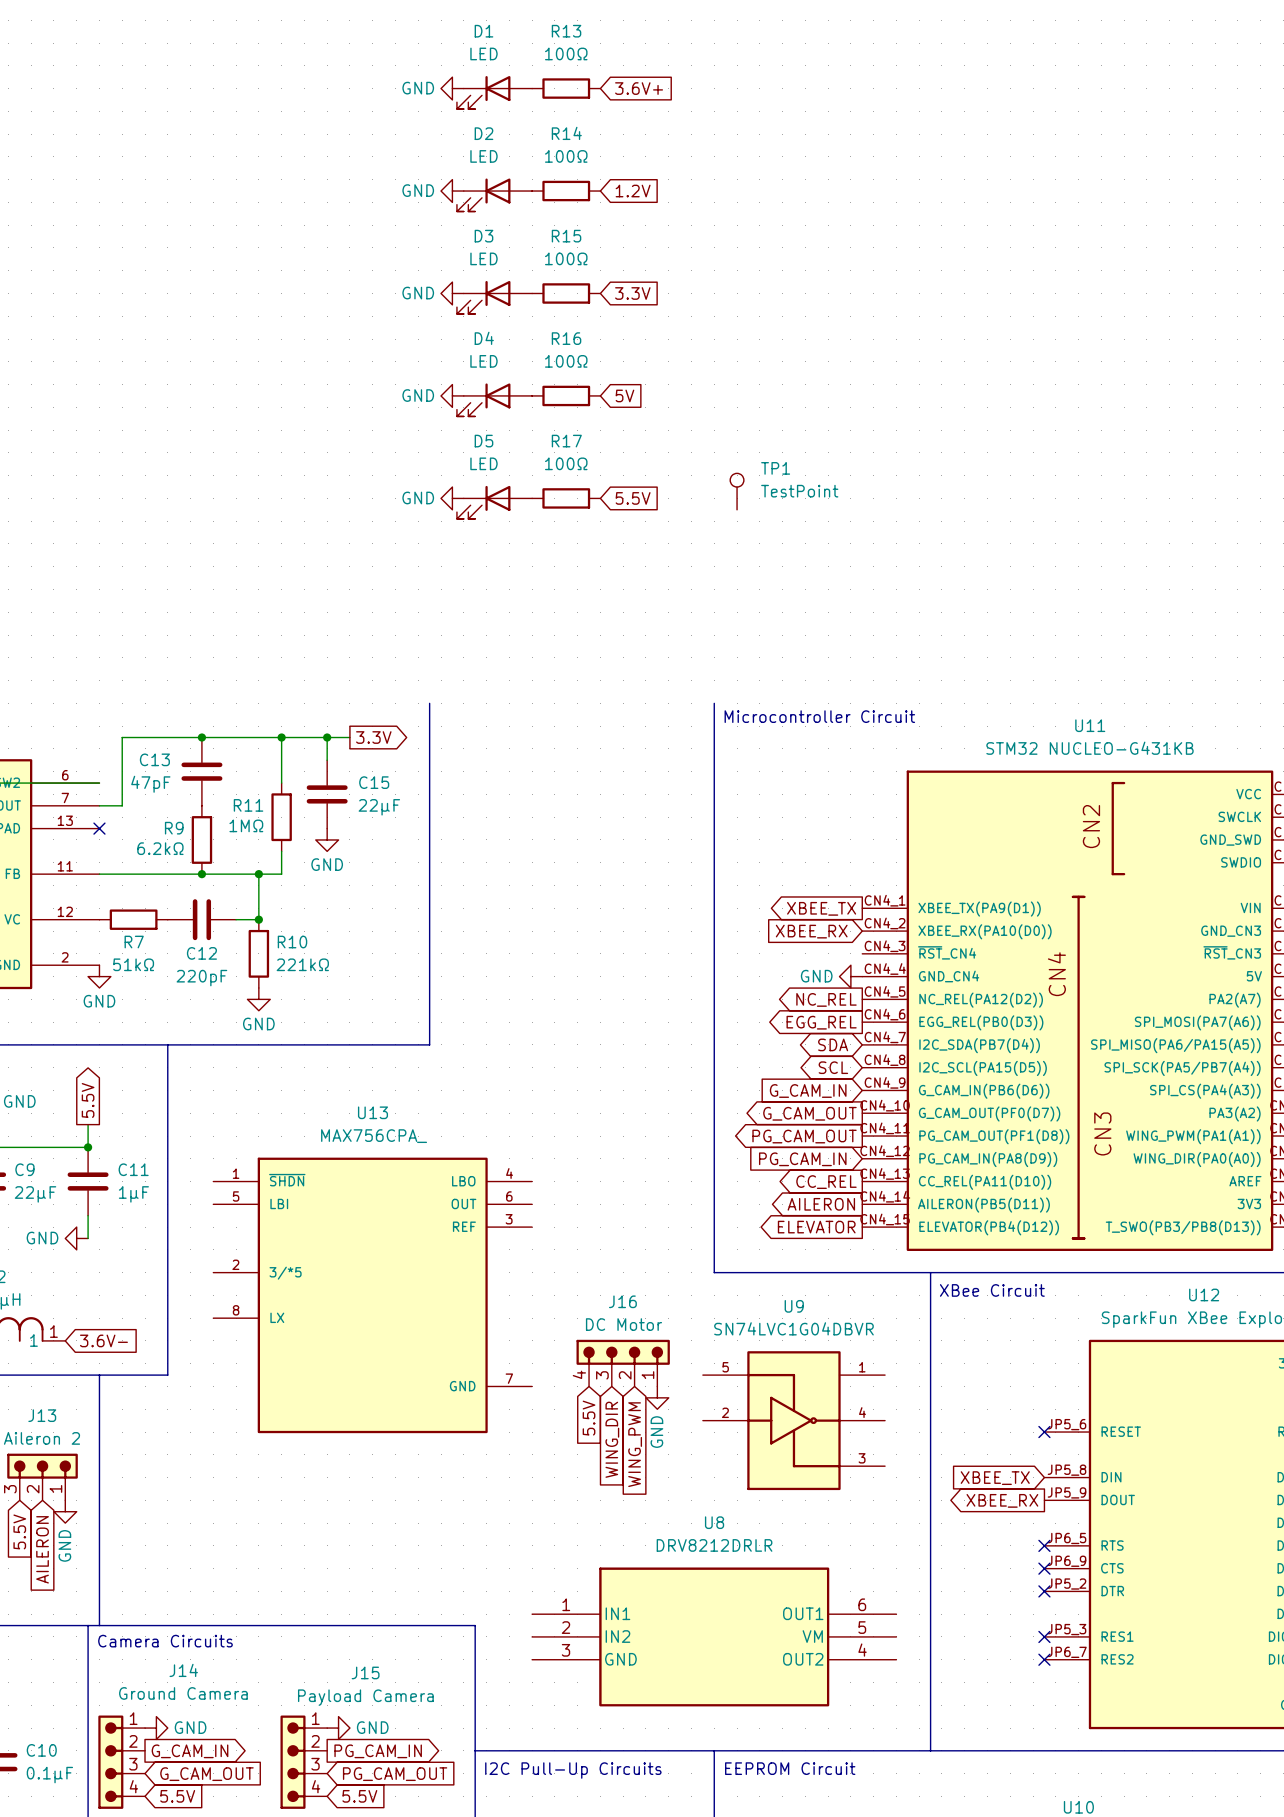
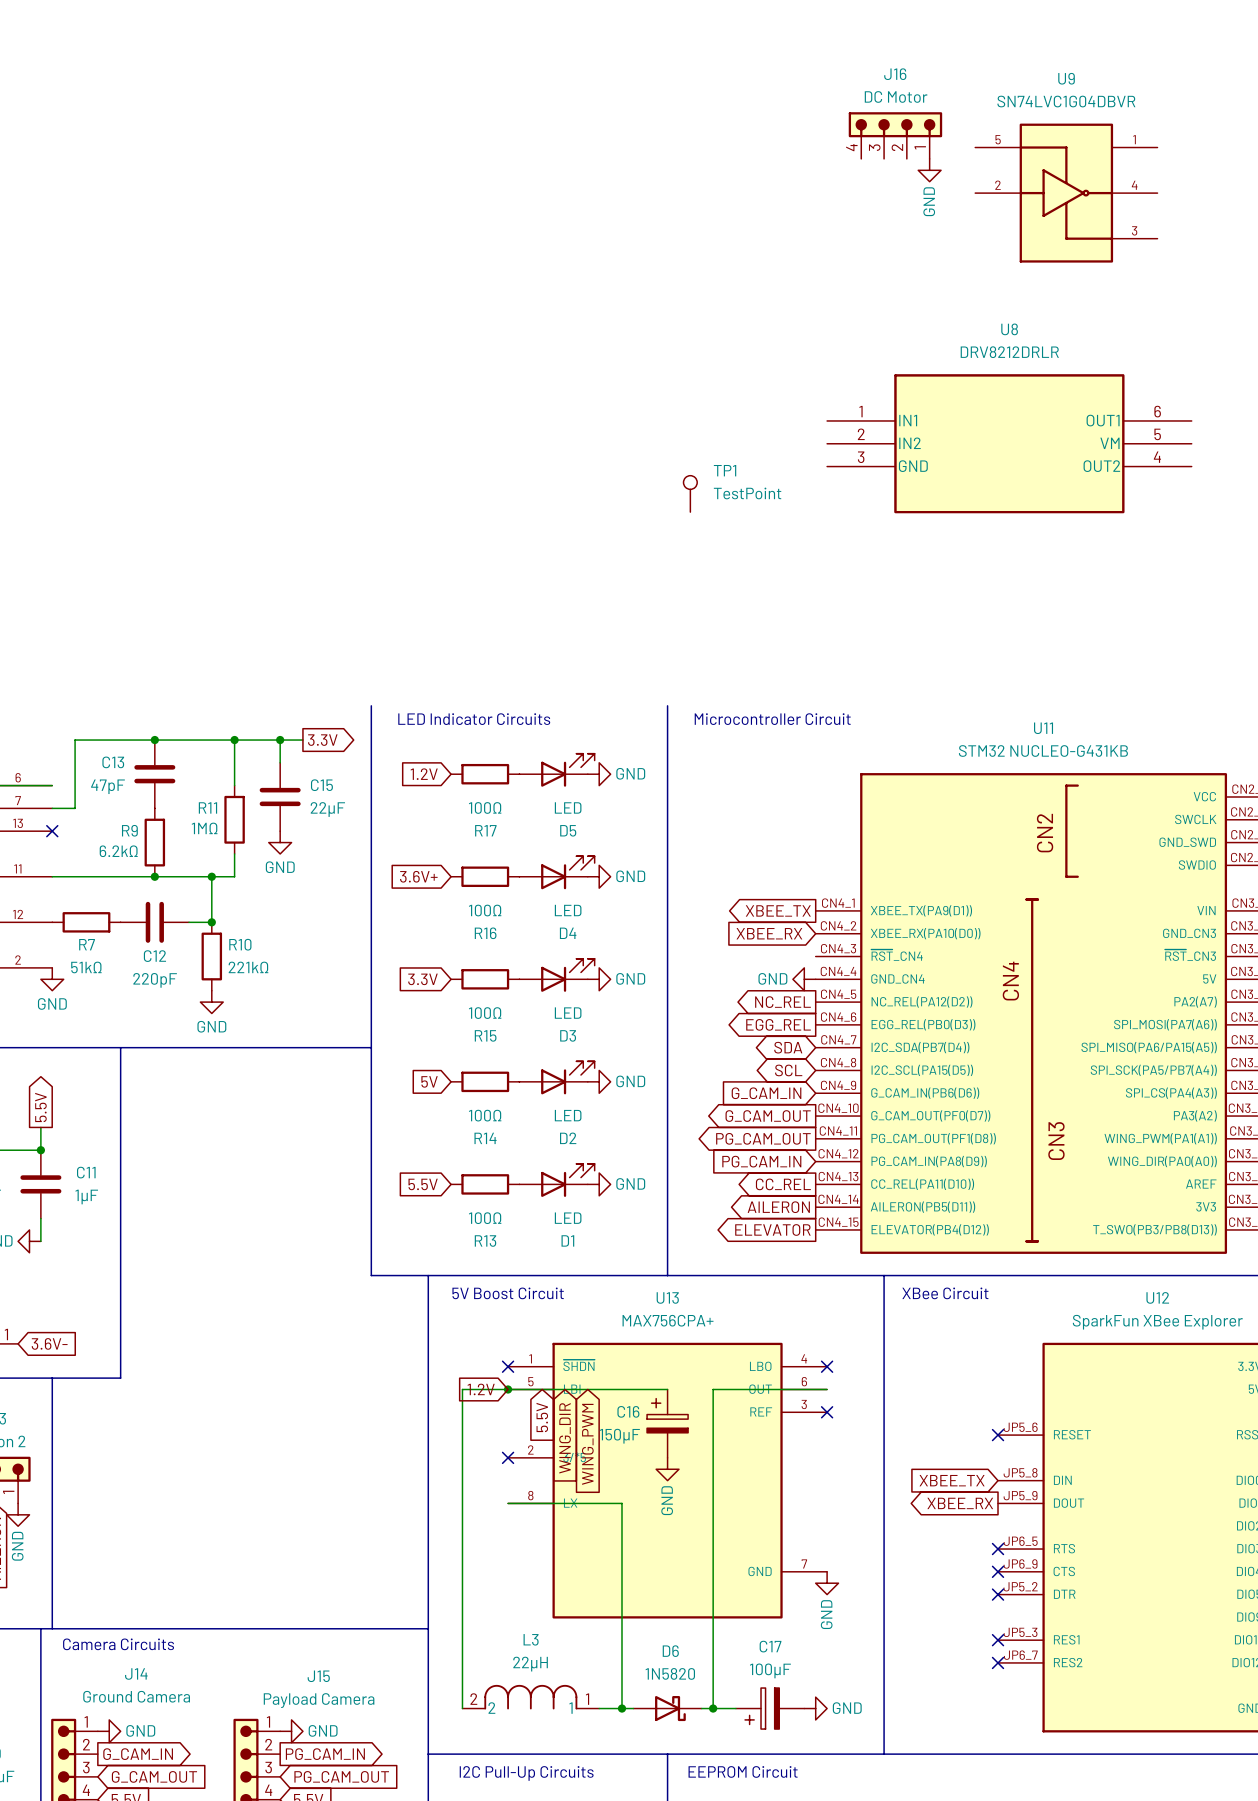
R13 name position: R13 (566, 31) -> R13 (485, 1241)
R13 value position: 100Ω (566, 53) -> 100Ω (485, 1218)
power symbol: GND (452, 88) -> none
R13 position: (566, 88) -> (485, 1184)
global label: 3.6V+ (639, 88) -> none
D1 rotation: 0° (483, 92) -> 180° (567, 1180)
D1 position: (494, 92) -> (557, 1180)
R14 name position: R14 (566, 133) -> R14 (485, 1138)
R14 value position: 100Ω (566, 156) -> 100Ω (485, 1115)
power symbol: none -> GND (929, 170)
power symbol: GND (452, 191) -> none
R14 position: (566, 191) -> (485, 1081)
global label: 1.2V (633, 191) -> none
D2 rotation: 0° (483, 195) -> 180° (567, 1077)
D2 position: (494, 195) -> (557, 1077)
R15 name position: R15 (566, 236) -> R15 (485, 1035)
R15 value position: 100Ω (566, 258) -> 100Ω (485, 1013)
power symbol: GND (452, 293) -> none
R15 position: (566, 293) -> (485, 979)
global label: 3.3V (632, 293) -> none
D3 rotation: 0° (483, 297) -> 180° (567, 975)
D3 position: (494, 297) -> (557, 975)
R16 name position: R16 (566, 338) -> R16 (485, 933)
R16 value position: 100Ω (566, 361) -> 100Ω (485, 910)
power symbol: GND (452, 395) -> none
R16 position: (566, 395) -> (485, 876)
global label: 5V (624, 395) -> none
D4 rotation: 0° (483, 399) -> 180° (567, 872)
D4 position: (494, 399) -> (557, 872)
R17 name position: R17 (566, 441) -> R17 (485, 830)
R17 value position: 100Ω (566, 463) -> 100Ω (485, 807)
power symbol: GND (452, 498) -> none
R17 position: (566, 498) -> (485, 774)
global label: 5.5V (633, 498) -> none
D5 rotation: 0° (483, 502) -> 180° (567, 770)
D5 position: (494, 502) -> (557, 770)
line: none -> (371, 705) (371, 1275) (667, 1275)
line: (429, 703) (429, 1044) (418, 1044) -> none
text: none -> LED Indicator Circuits (474, 719)
global label: none -> 1.2V (424, 774)
power symbol: none -> GND (599, 774)
global label: none -> 3.6V+ (418, 876)
power symbol: none -> GND (599, 876)
global label: none -> 3.3V (422, 979)
power symbol: none -> GND (599, 979)
global label: none -> 5V (429, 1081)
power symbol: none -> GND (599, 1081)
U13 value: MAX756CPA_ (374, 1136) -> MAX756CPA+ (668, 1320)
global label: none -> 5.5V (423, 1184)
power symbol: none -> GND (599, 1184)
line: none -> (428, 1275) (428, 1628)
text: none -> 5V Boost Circuit (508, 1293)
U13 position: (372, 1295) -> (667, 1480)
no-connect mark: none -> (508, 1366)
J16 position: (623, 1363) -> (895, 135)
no-connect mark: none -> (827, 1366)
global label: none -> 1.2V (481, 1389)
junction: none -> (508, 1389)
wire: none -> (667, 1389) (462, 1389) (462, 1708)
power symbol position: GND (657, 1397) -> GND (667, 1469)
no-connect mark: none -> (827, 1412)
C16: none -> 150μF (667, 1423)
U9 position: (793, 1420) -> (1066, 193)
no-connect mark: none -> (508, 1457)
wire: none -> (508, 1503) (621, 1503) (621, 1708)
power symbol: none -> GND (827, 1583)
U8 position: (714, 1636) -> (1009, 443)
L3: none -> 22μH (530, 1697)
junction: none -> (621, 1708)
D6: none -> 1N5820 (667, 1708)
junction: none -> (713, 1708)
C17: none -> 100μF (770, 1708)
power symbol: none -> GND (815, 1708)

